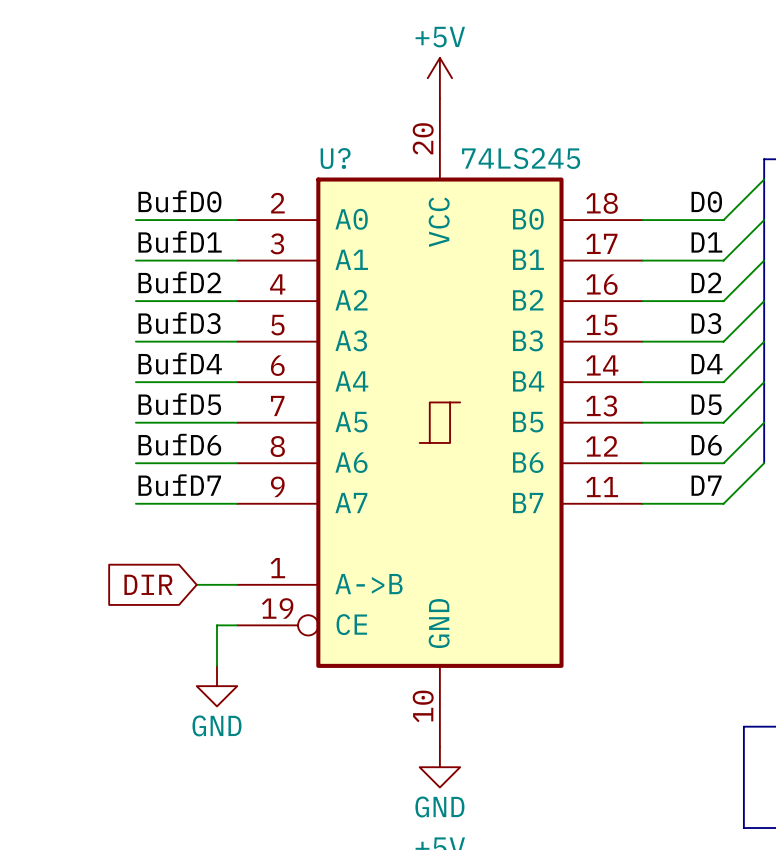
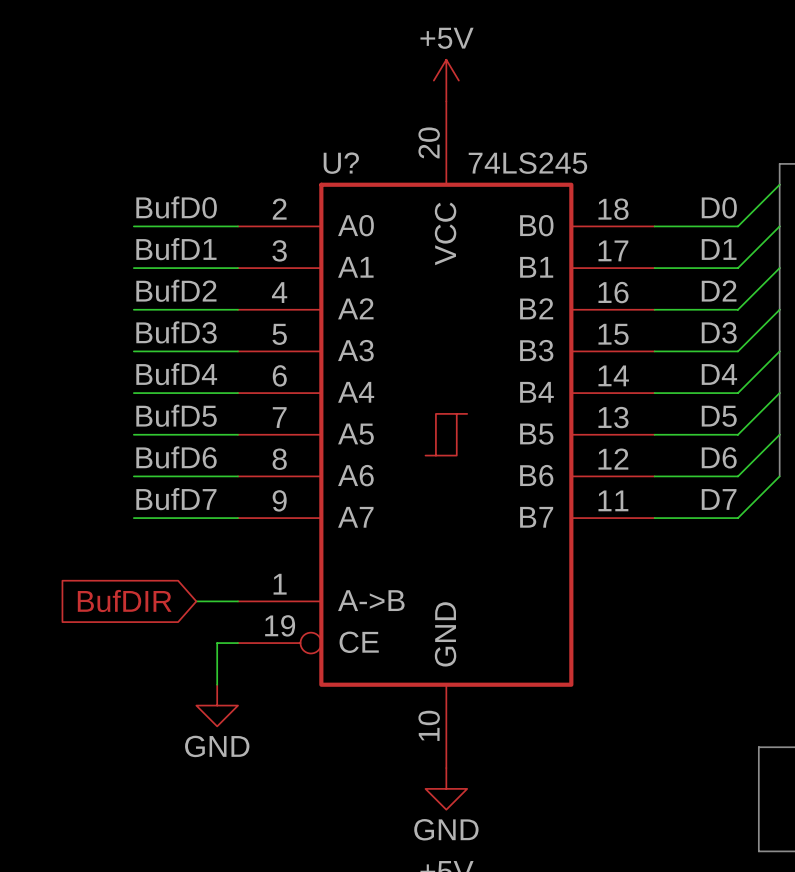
global label: DIR (148, 584) -> BufDIR (124, 601)

